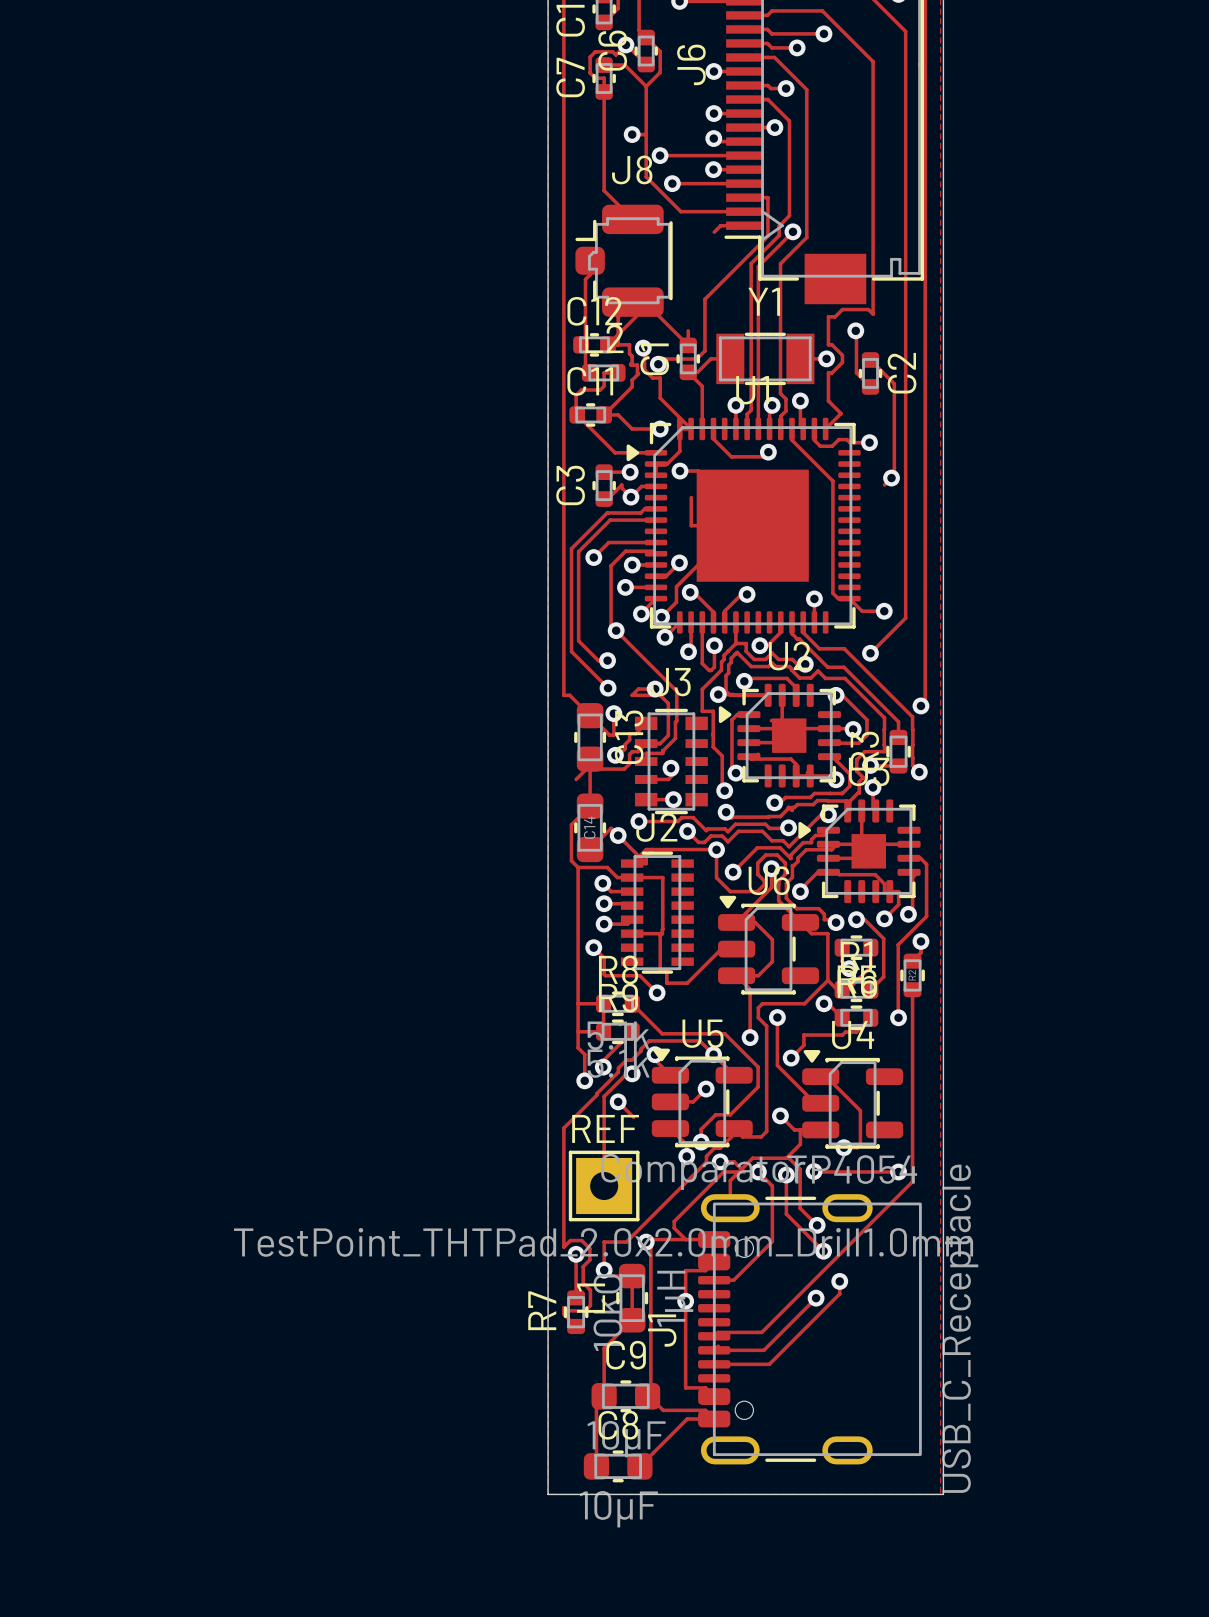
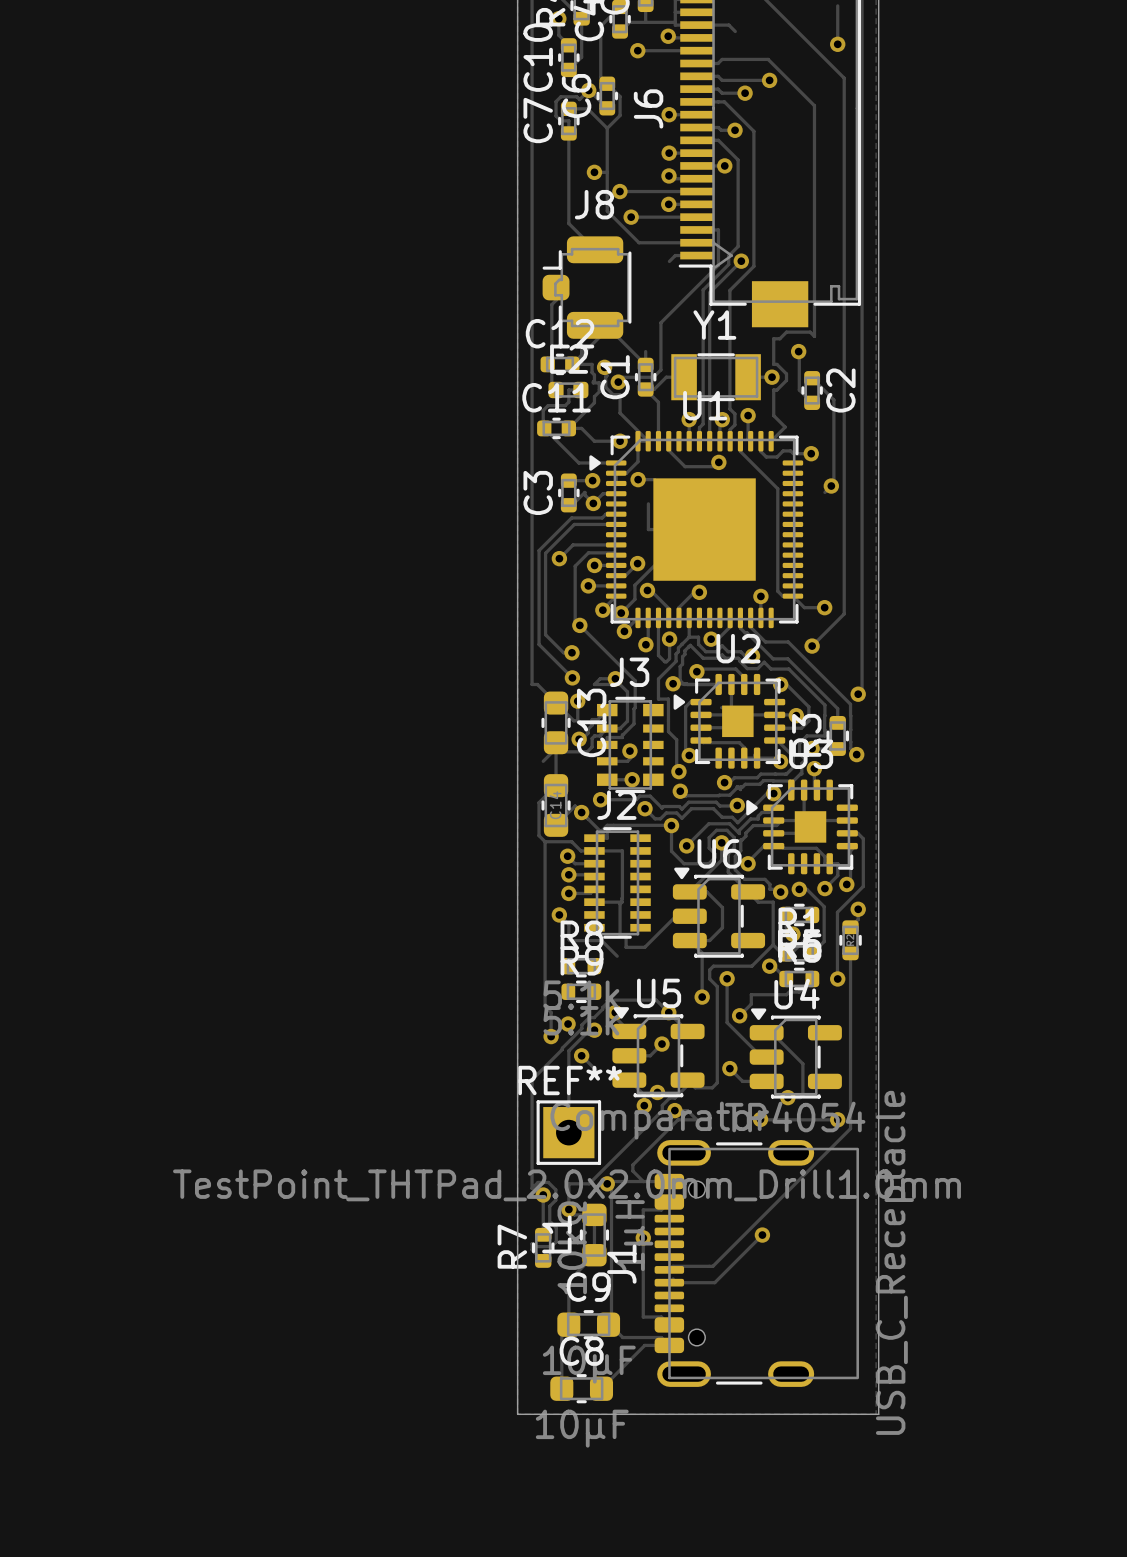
via: (657, 992) -> none
track: (578, 1003) (603, 1003) (603, 1031) (578, 1031) -> none
track: (632, 1003) (662, 1033) (724, 1033) (758, 1066) (758, 1087) (730, 1114) (715, 1114) (701, 1129) (701, 1142) -> none
track: (632, 1031) (603, 1060) (603, 1067) -> none
REF name: REF (605, 1128) -> REF** (570, 1080)
track: (800, 1129) (800, 1144) (786, 1158) -> none
track: (758, 1171) (772, 1186) (772, 1241) (733, 1280) (714, 1280) -> none
via: (758, 1171) -> none
track: (786, 1175) (786, 1214) (823, 1251) -> none
via: (786, 1175) -> none
track: (730, 1208) (730, 1180) (752, 1158) (789, 1158) (800, 1169) (800, 1208) (817, 1225) -> none
via: (817, 1225) -> none
via: (823, 1251) -> none
track: (839, 1281) (839, 1293) (769, 1364) (714, 1364) -> none
via: (839, 1281) -> none

